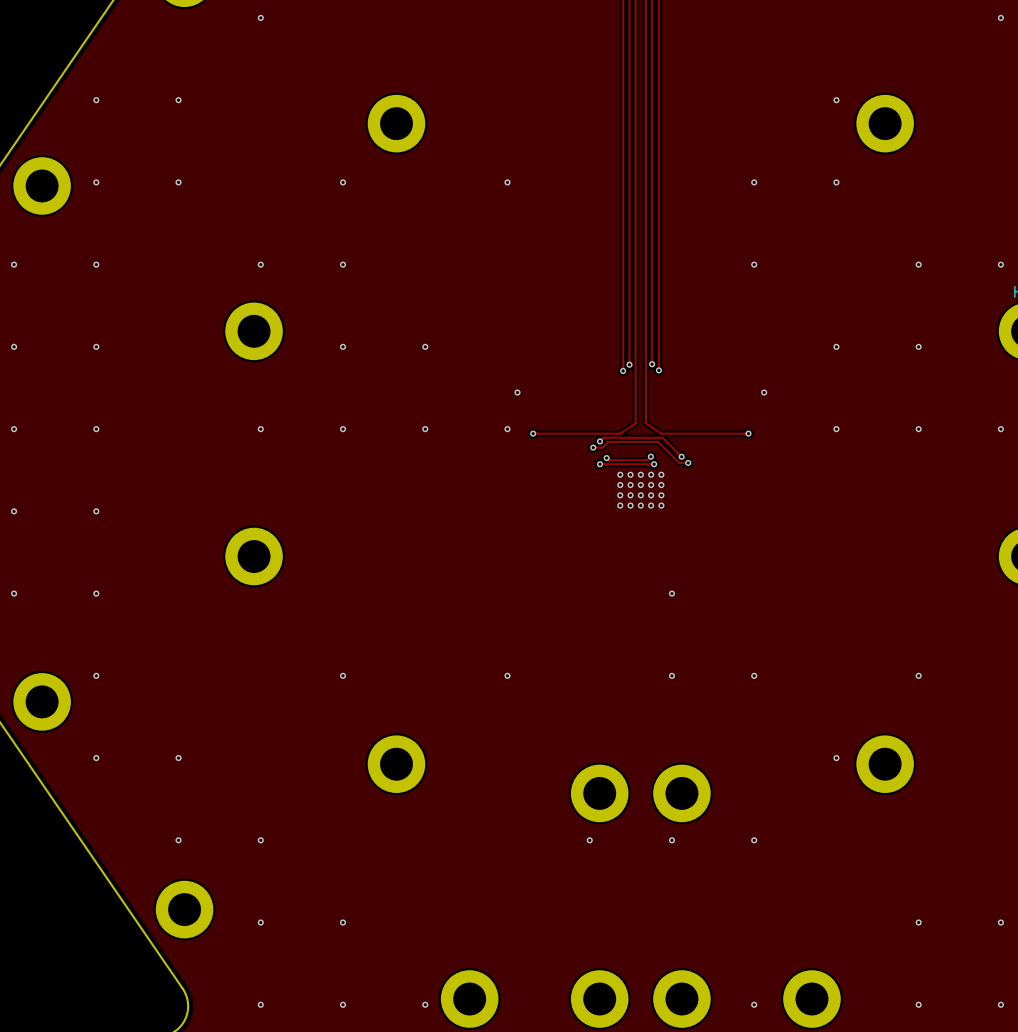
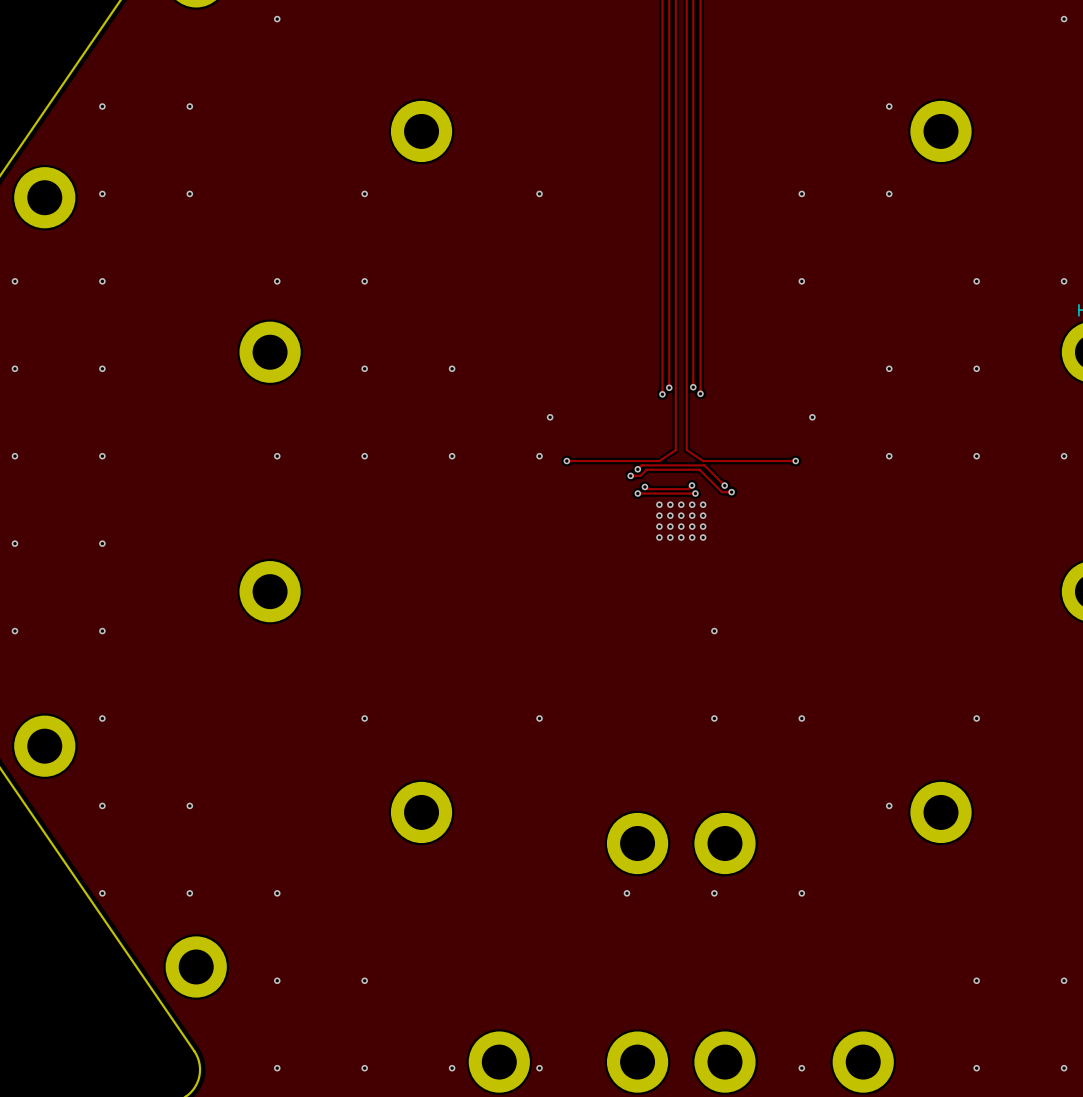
via: none -> (102, 893)
via: none -> (539, 1068)

